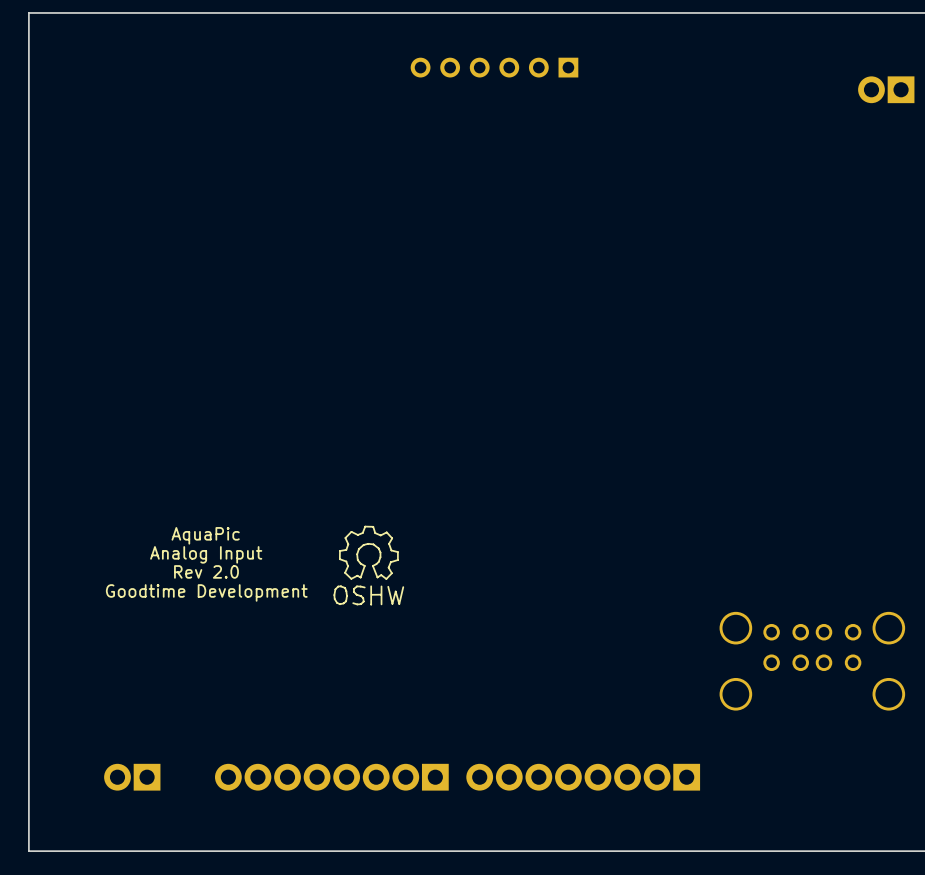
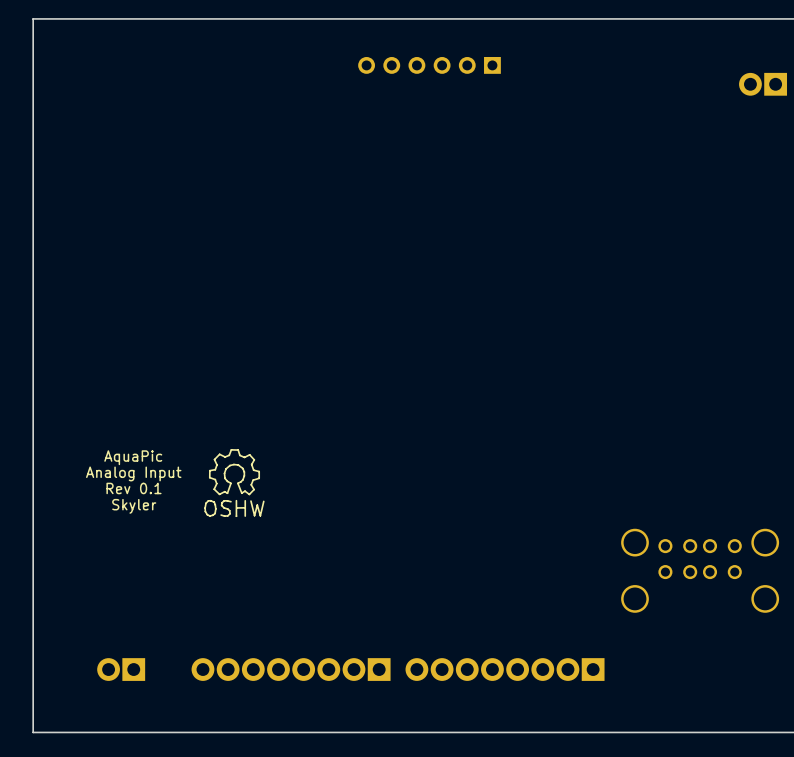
text position: AquaPic (205, 535) -> AquaPic (133, 457)
text position: Analog Input (206, 554) -> Analog Input (133, 473)
drawing position: (368, 565) -> (234, 483)
text: Rev 2.0 (206, 571) -> Rev 0.1 (133, 488)
text: none -> Skyler (134, 506)
text: Goodtime Development (206, 592) -> none

